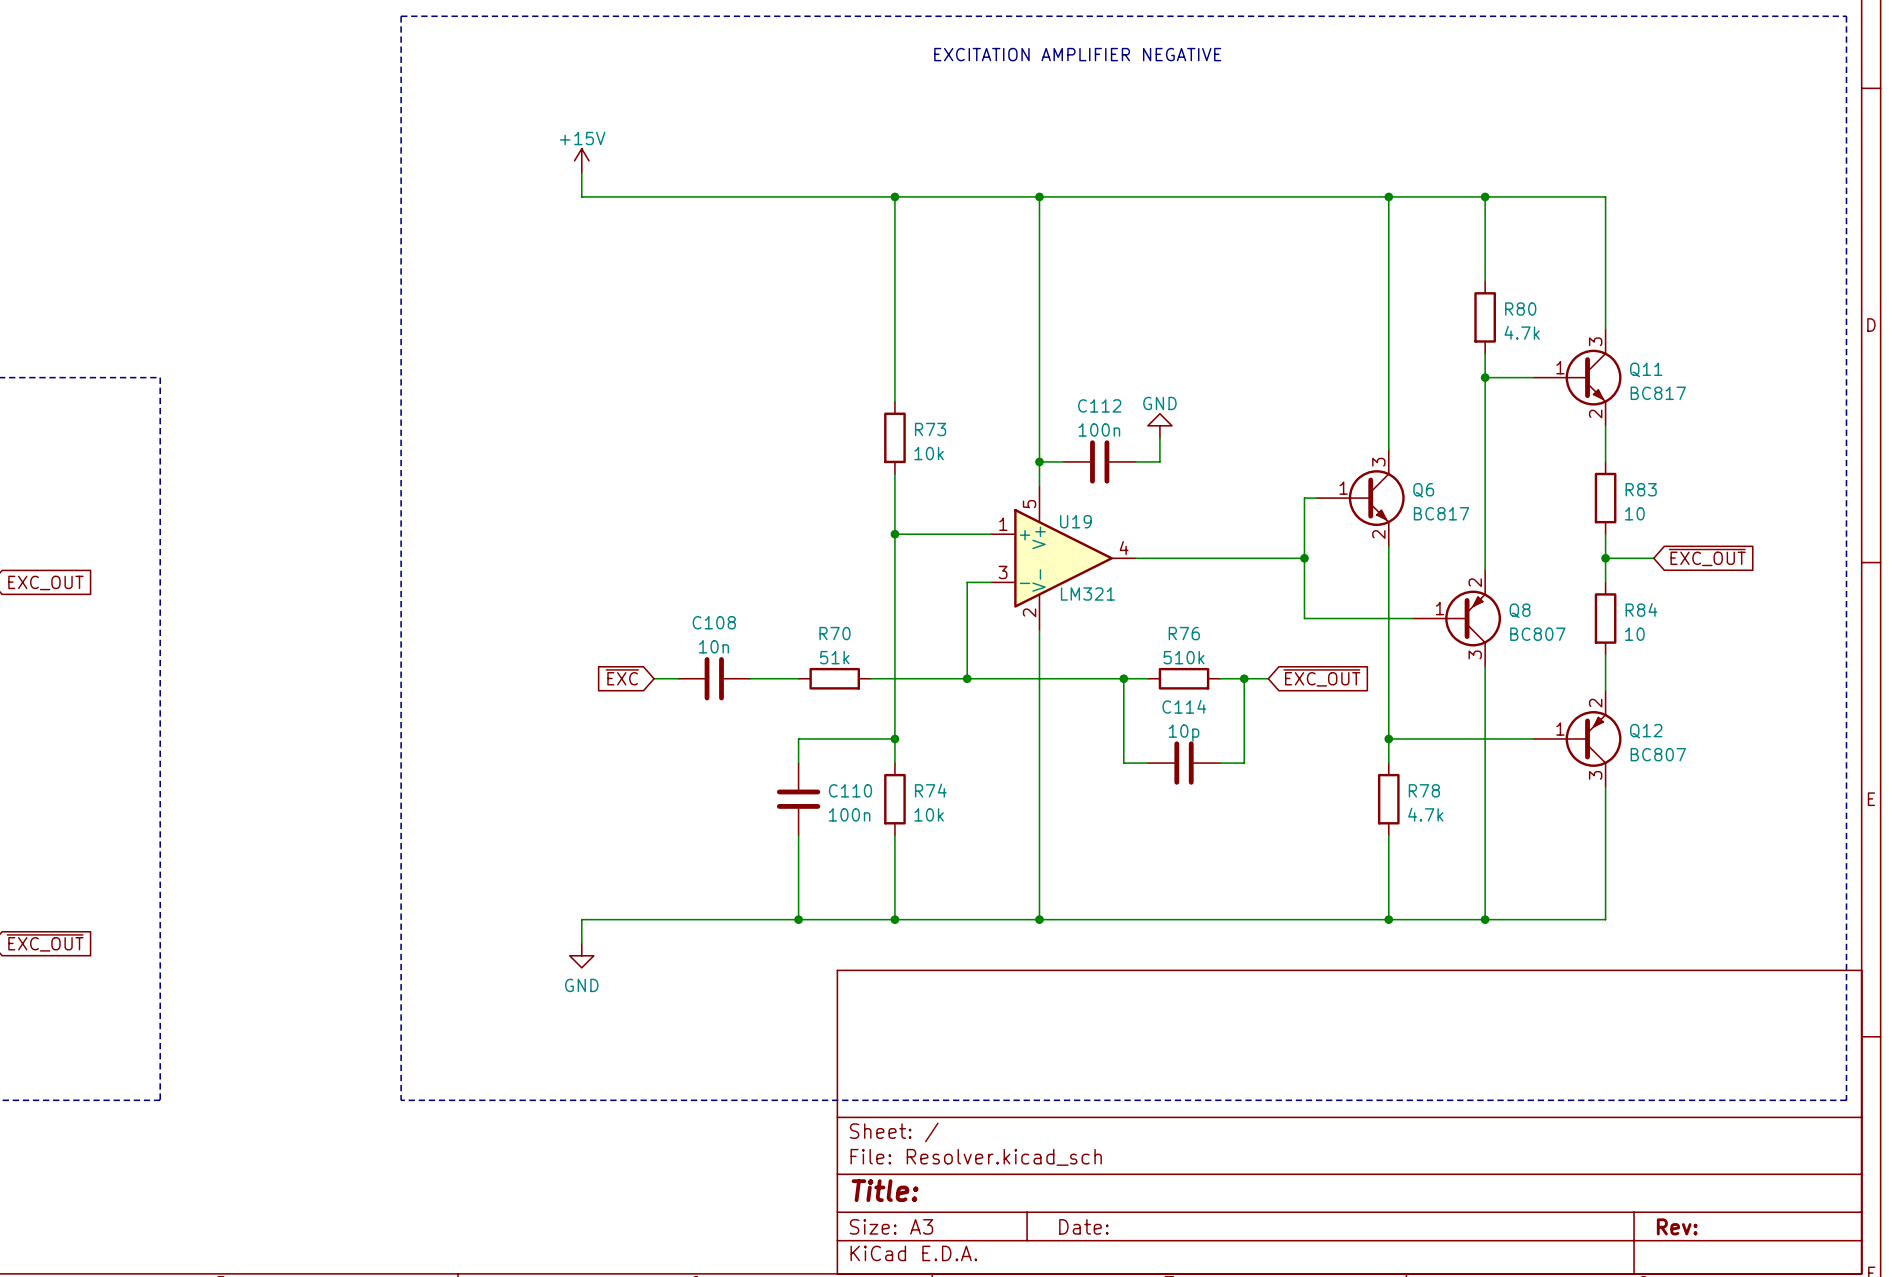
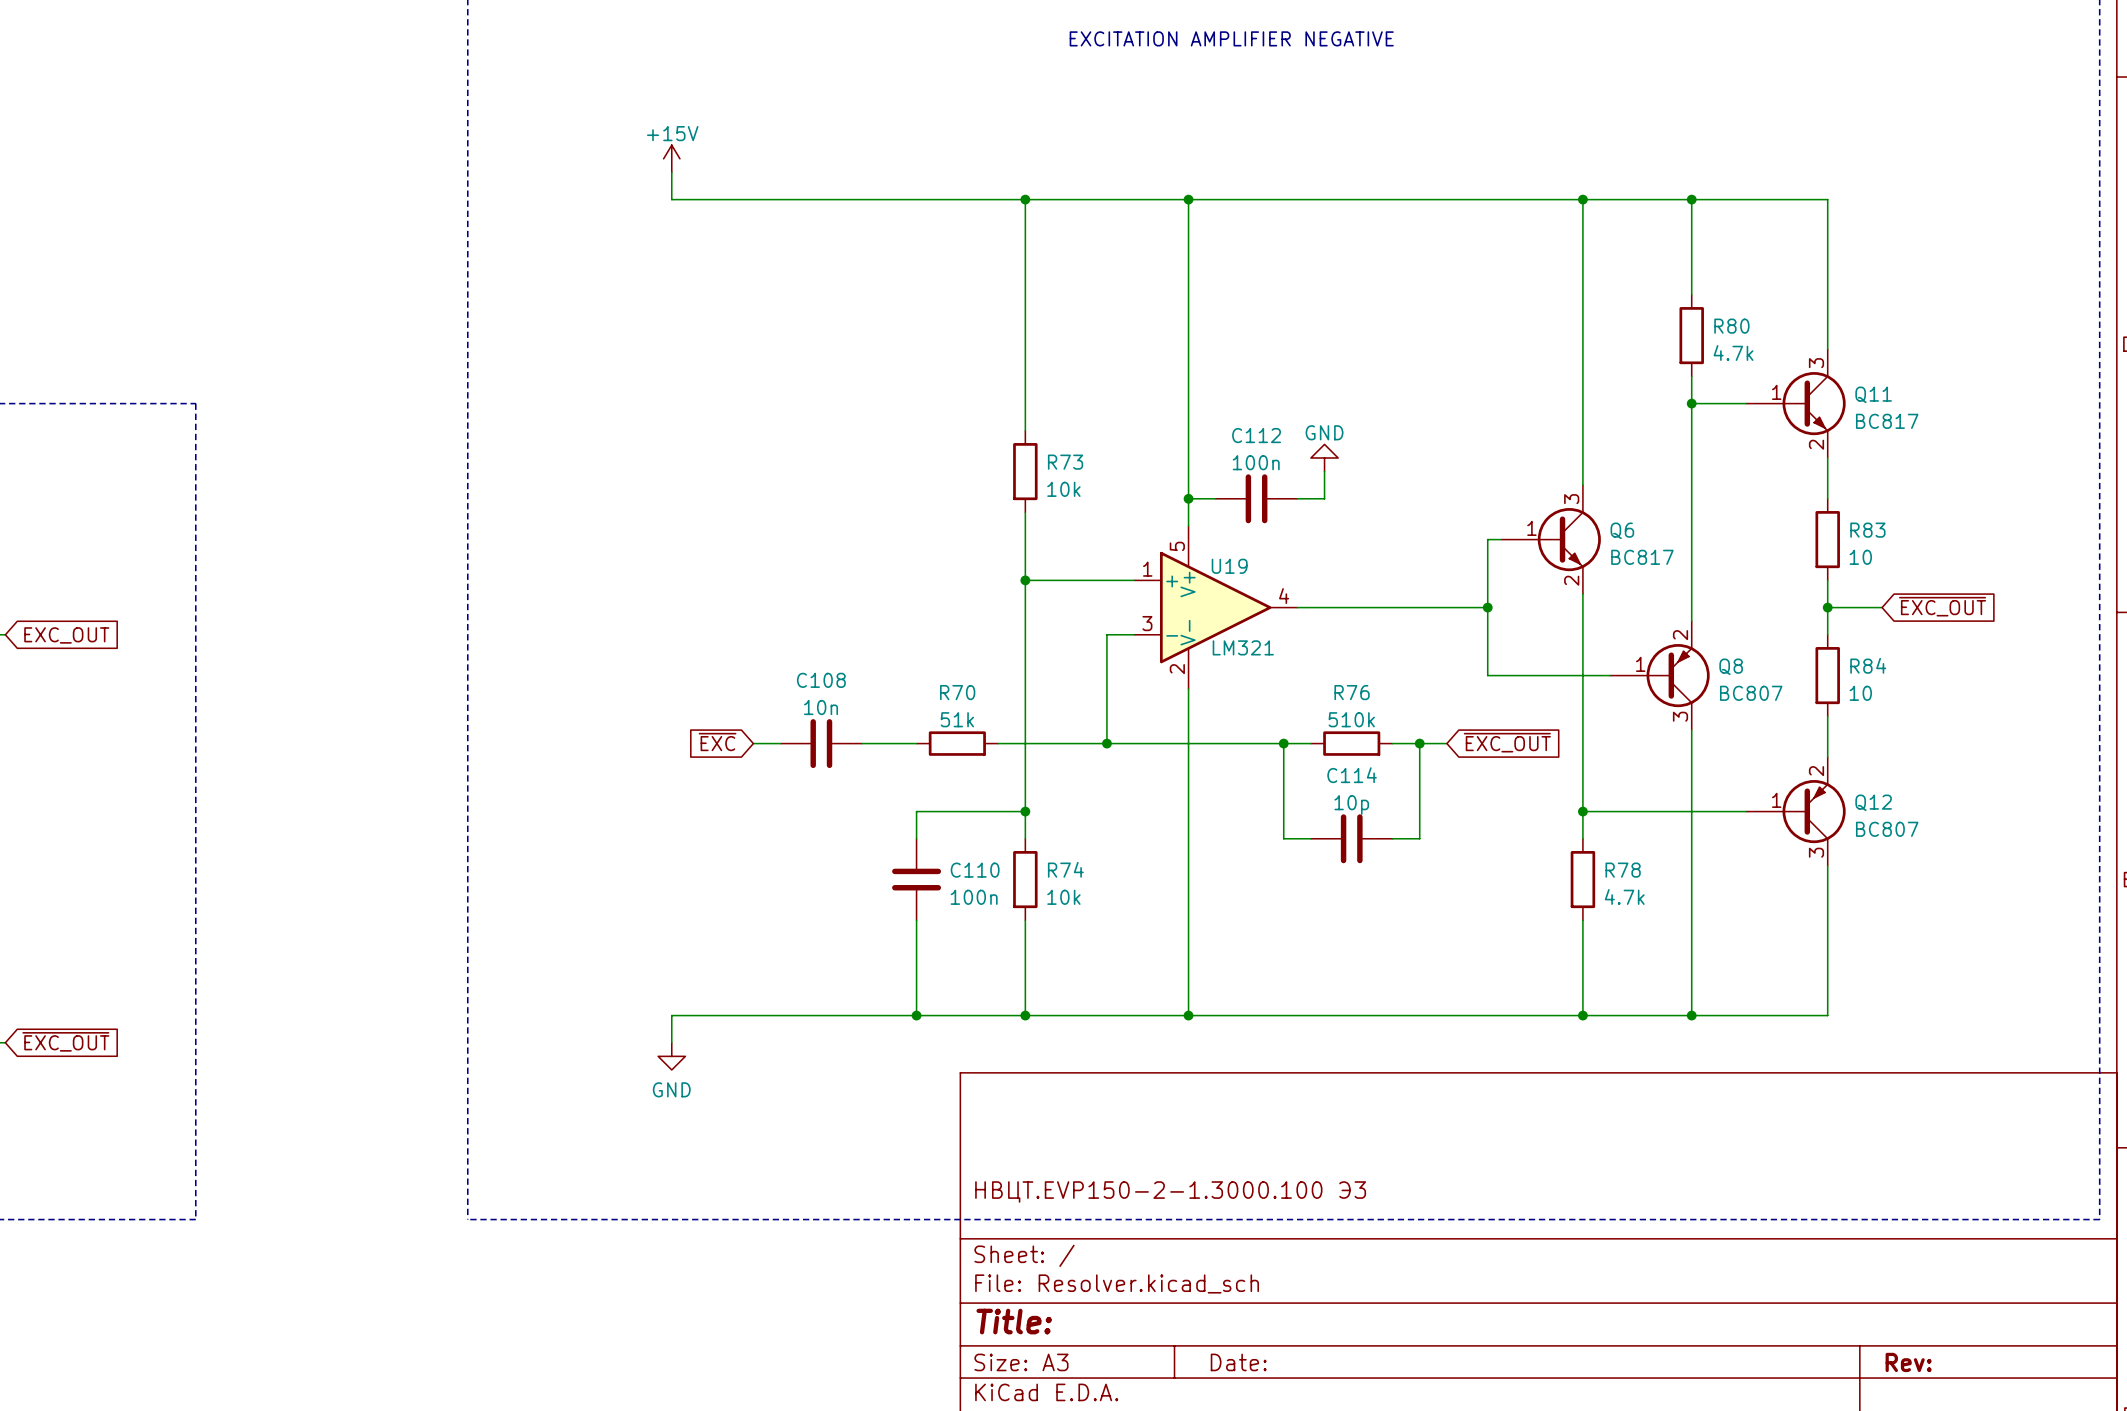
title block: none -> НВЦТ.EVP150-2-1.3000.100 Э3 (1170, 1191)

